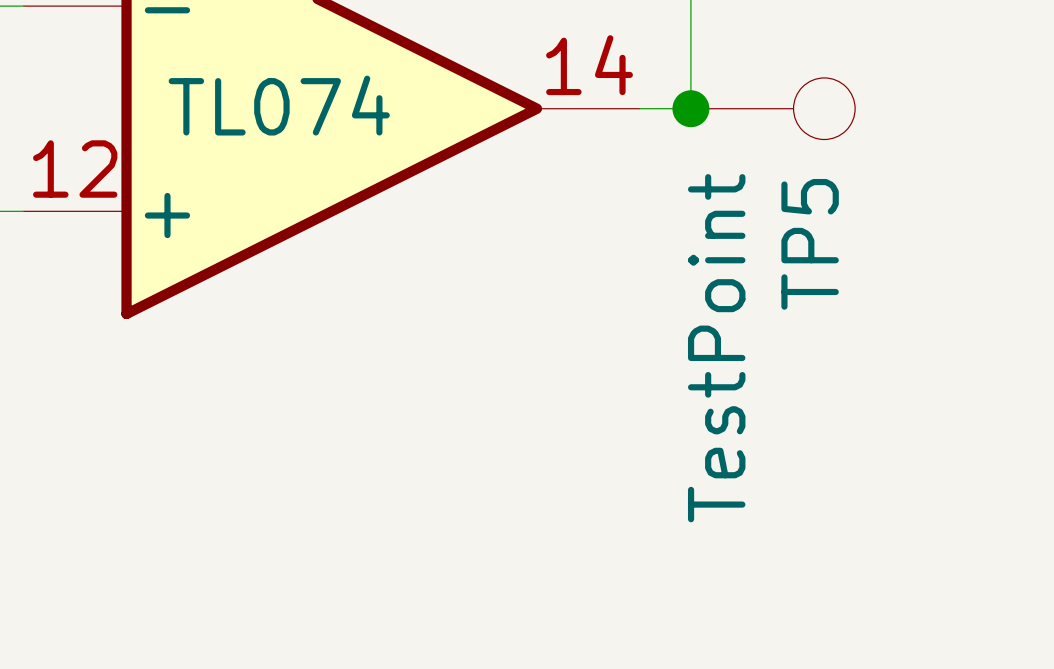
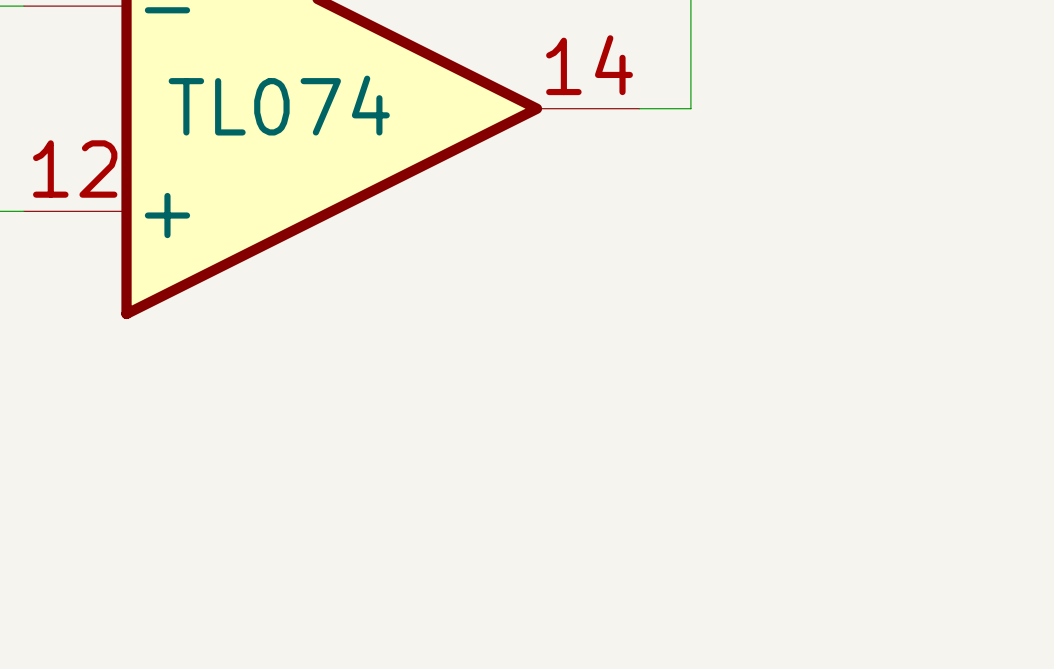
junction: (690, 108) -> none
TP5: TestPoint (773, 108) -> none

